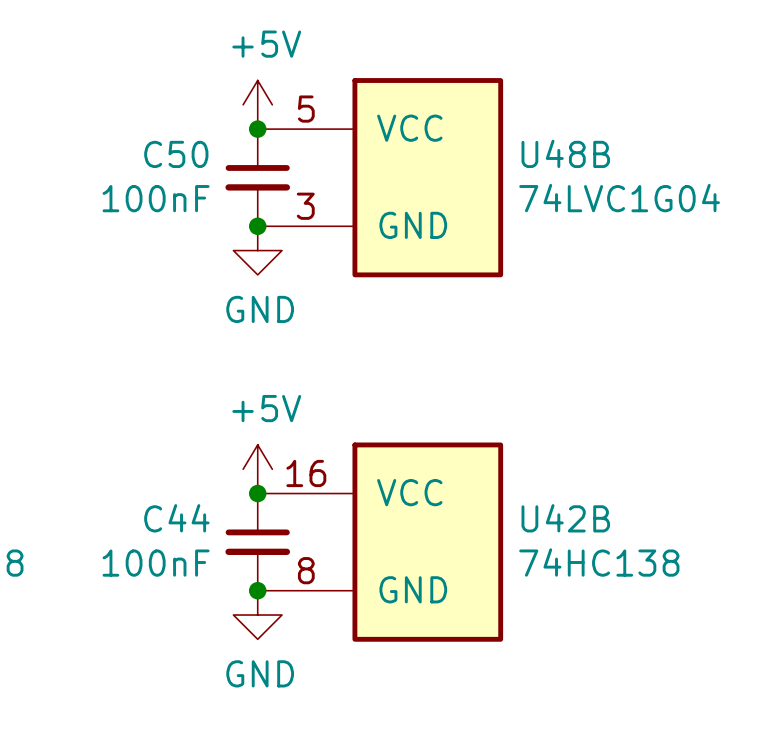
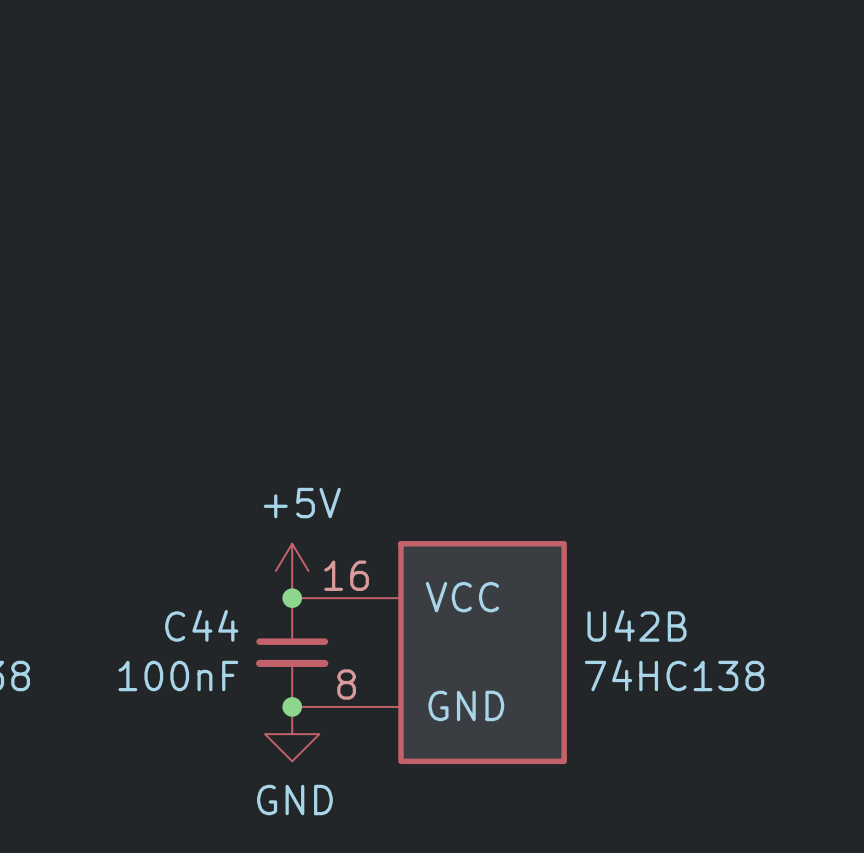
power symbol: +5V (257, 104) -> none
junction: (257, 129) -> none
C50: 100nF (257, 177) -> none
U48B: 74LVC1G04 (380, 177) -> none
junction: (257, 226) -> none
power symbol: GND (257, 250) -> none

